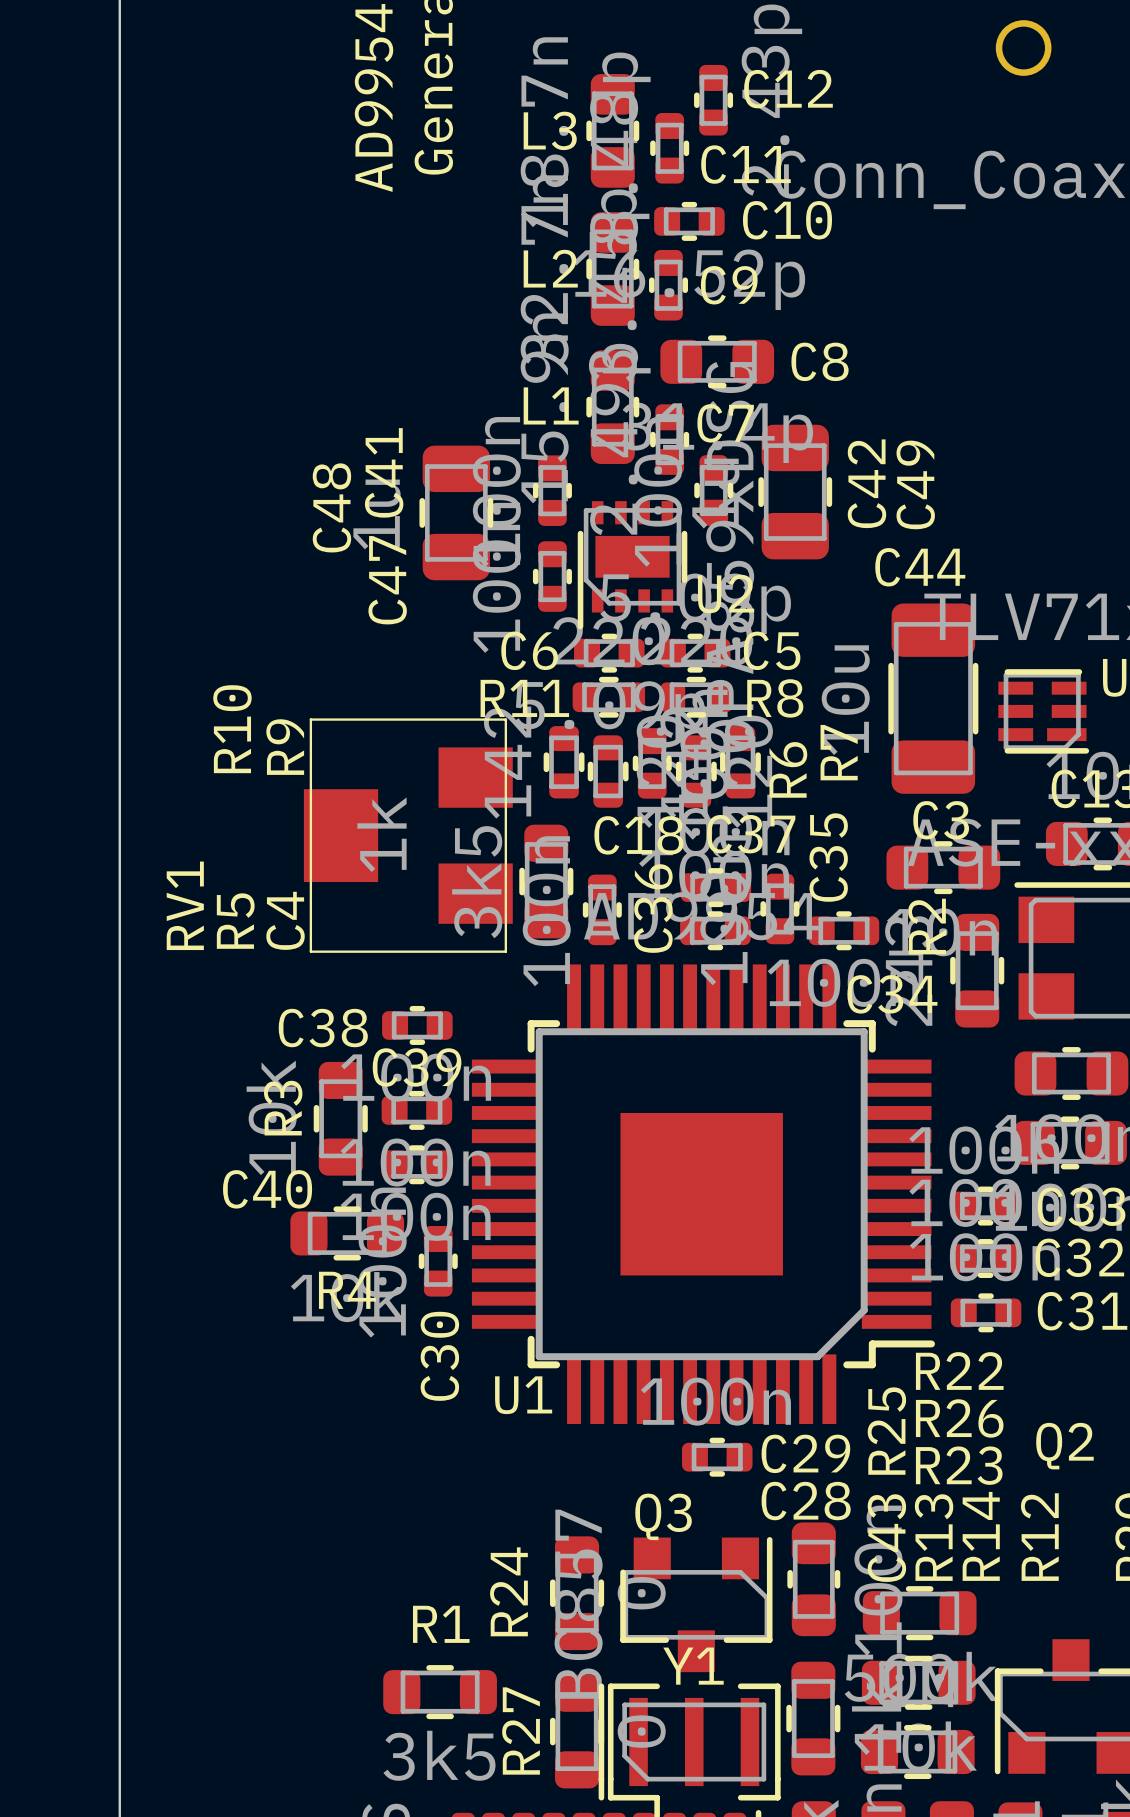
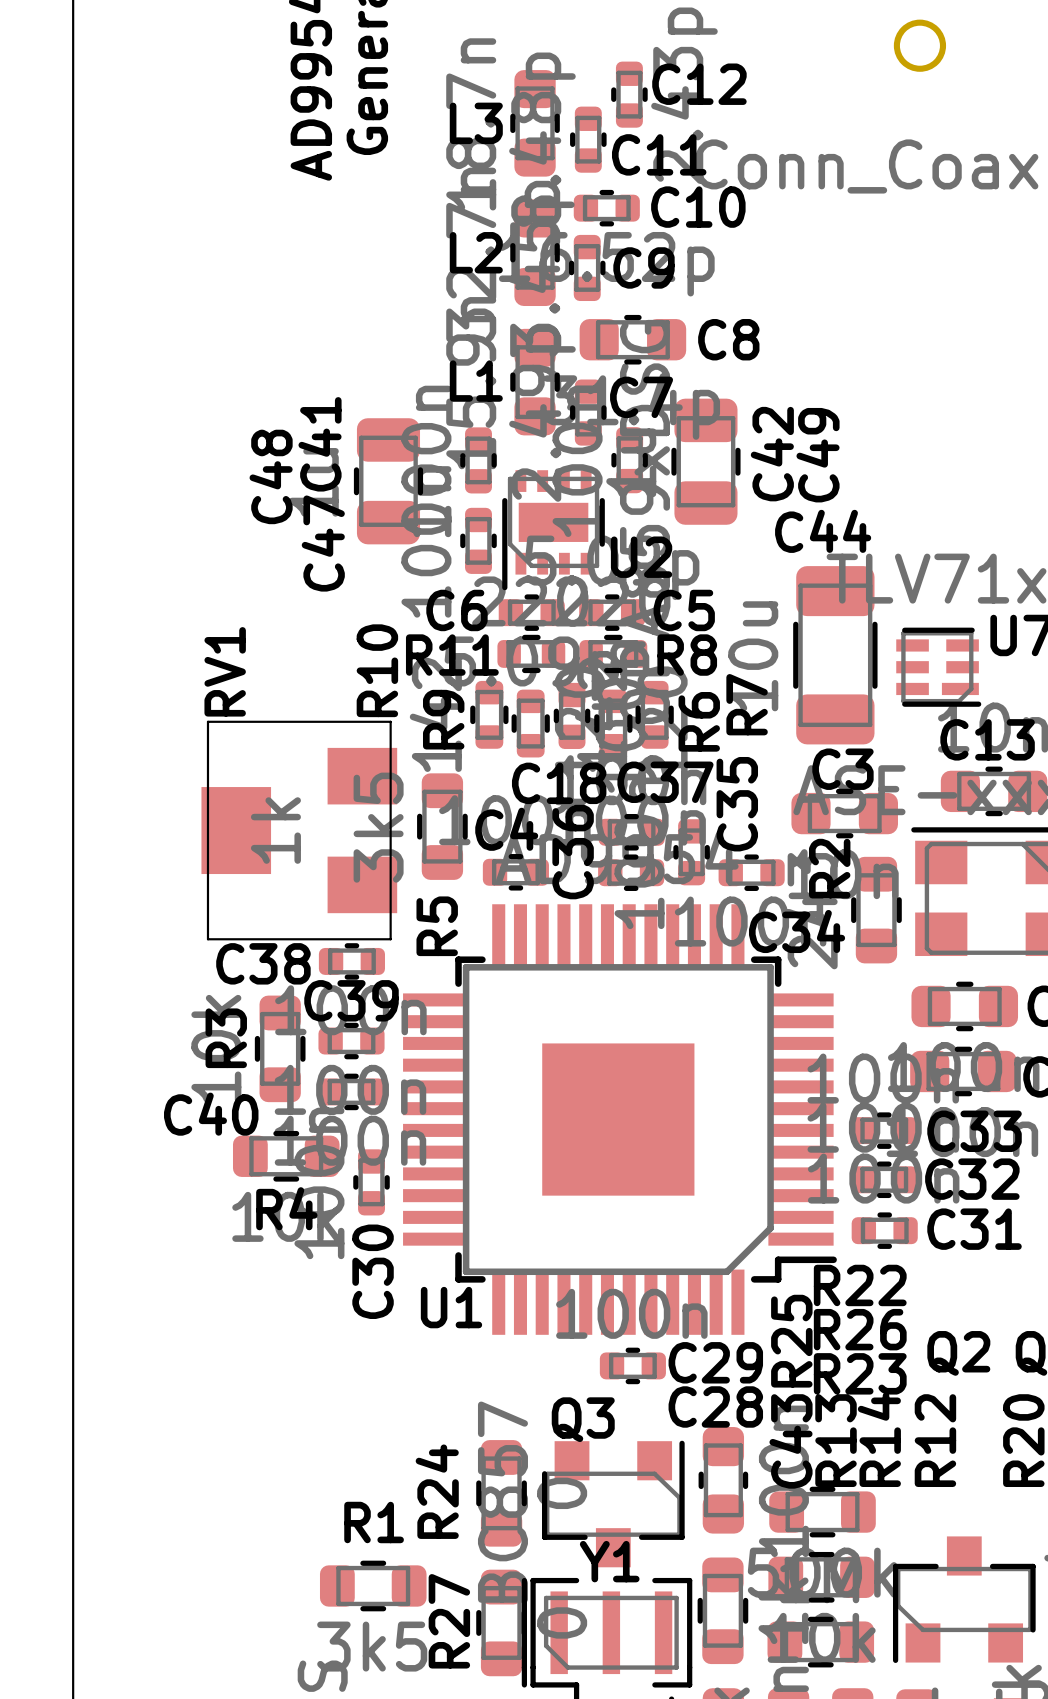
R10 name position: R10 (232, 729) -> R10 (377, 670)
R9 name position: R9 (285, 747) -> R9 (443, 719)
RV1 position: (408, 835) -> (299, 830)
R5 position: (546, 881) -> (442, 826)
RV1 name position: RV1 (185, 905) -> RV1 (225, 671)
C4 rotation: 0° (602, 909) -> 90° clockwise (515, 872)
C4 name position: C4 (285, 920) -> C4 (506, 829)
R5 name position: R5 (235, 921) -> R5 (437, 926)

